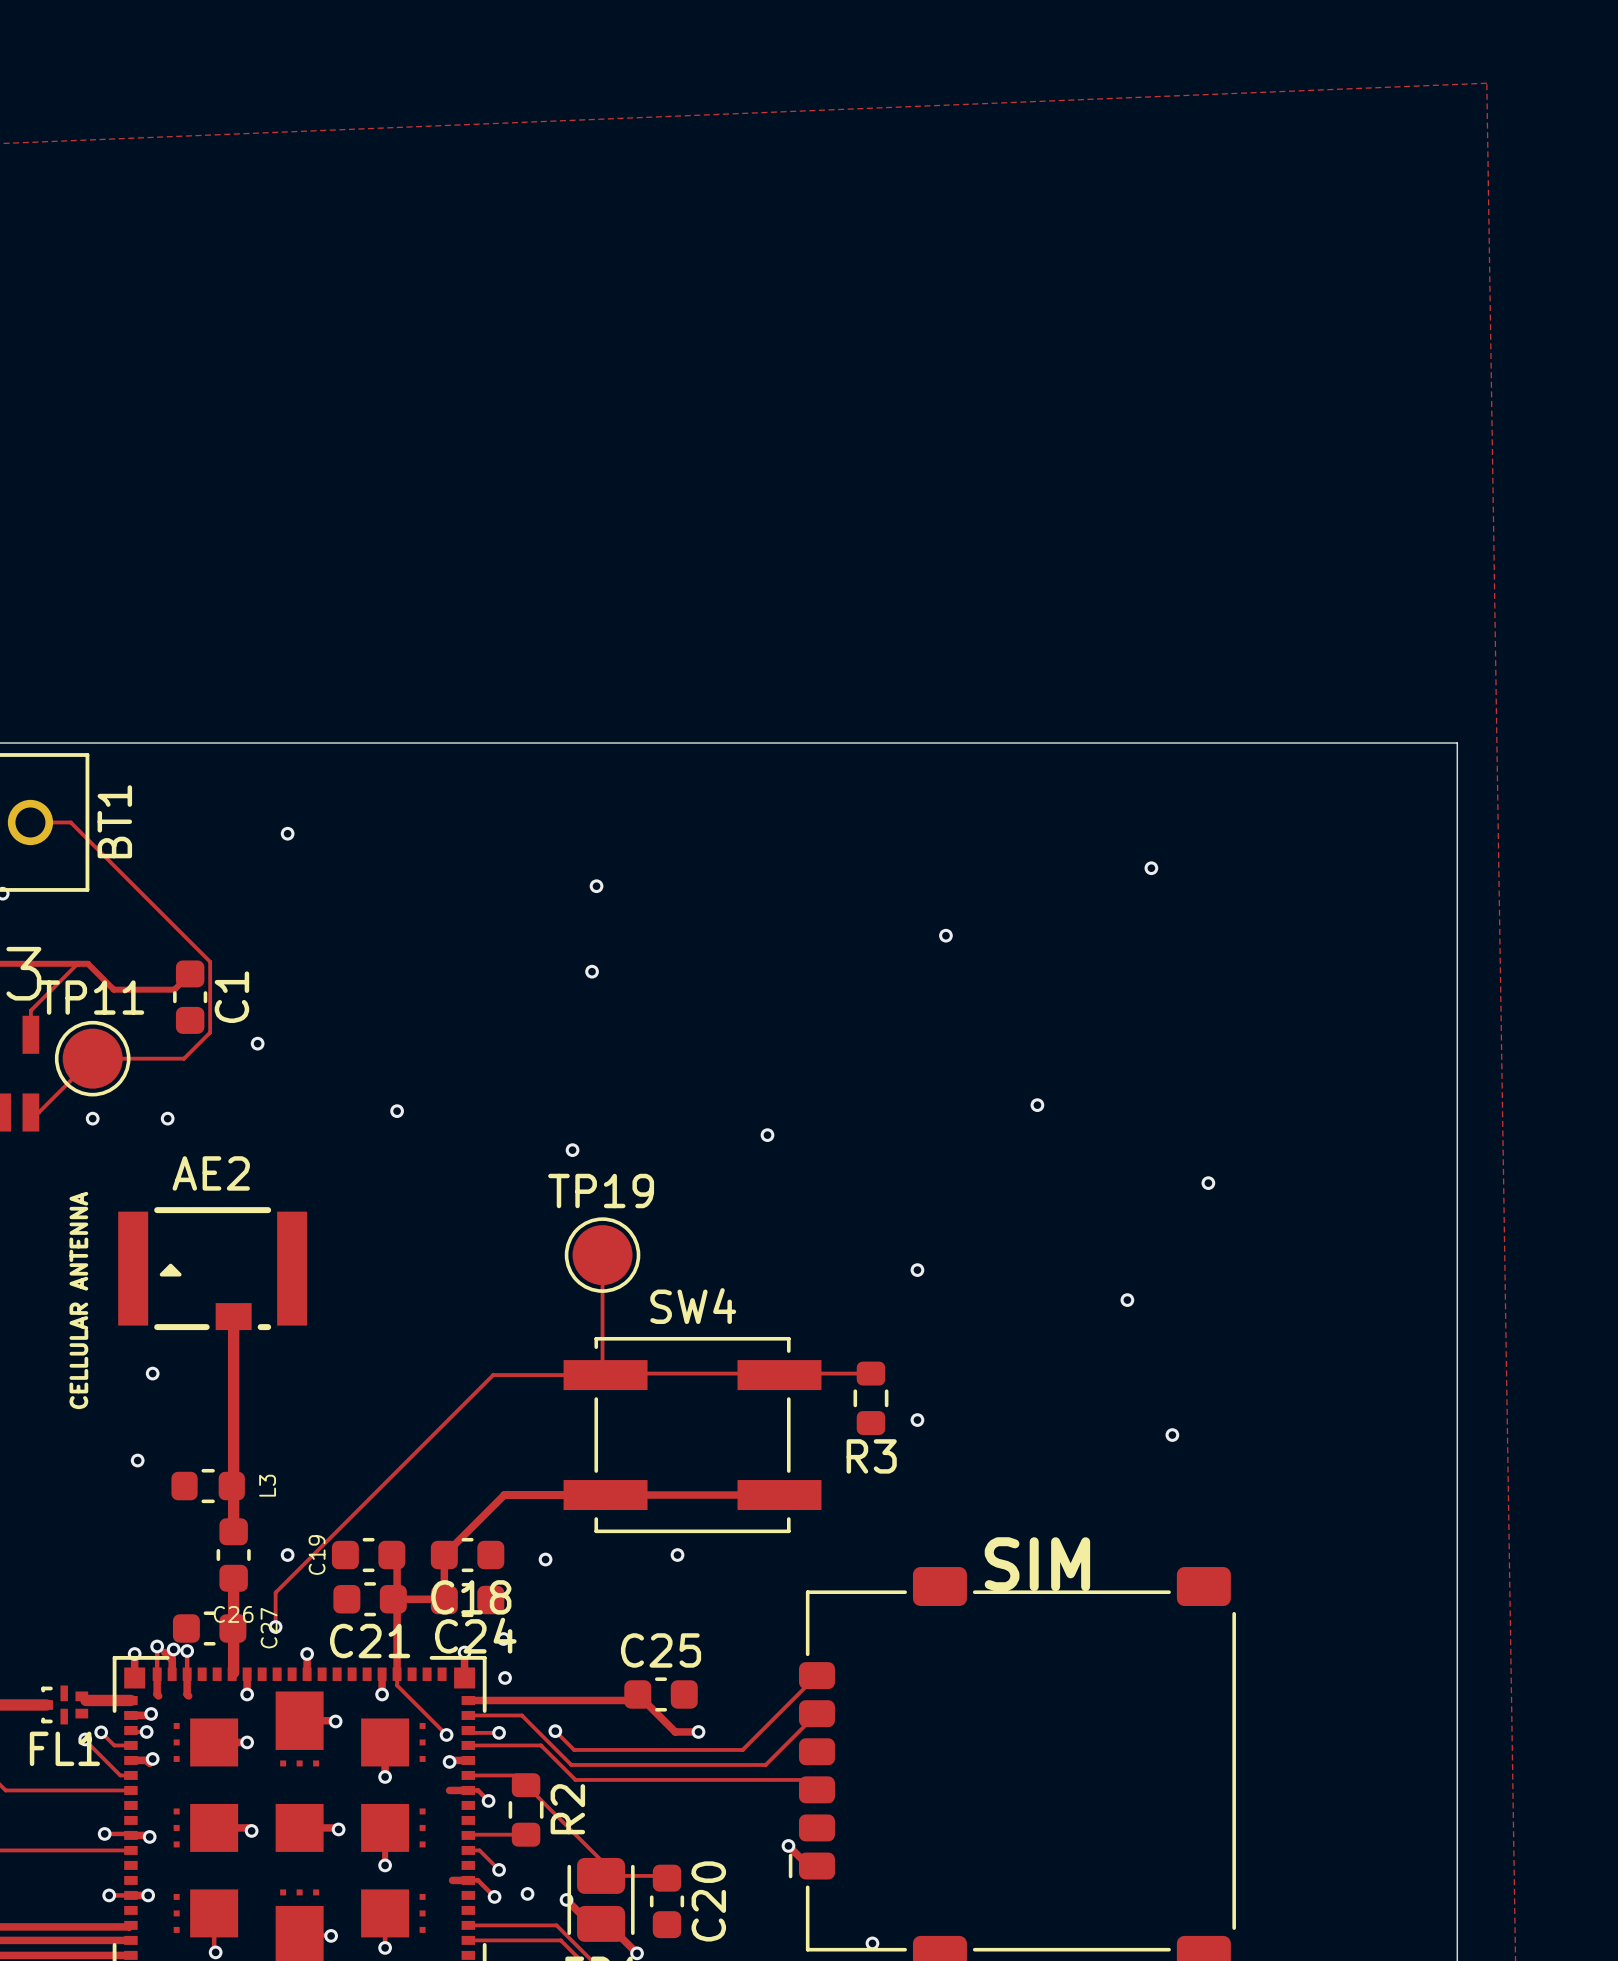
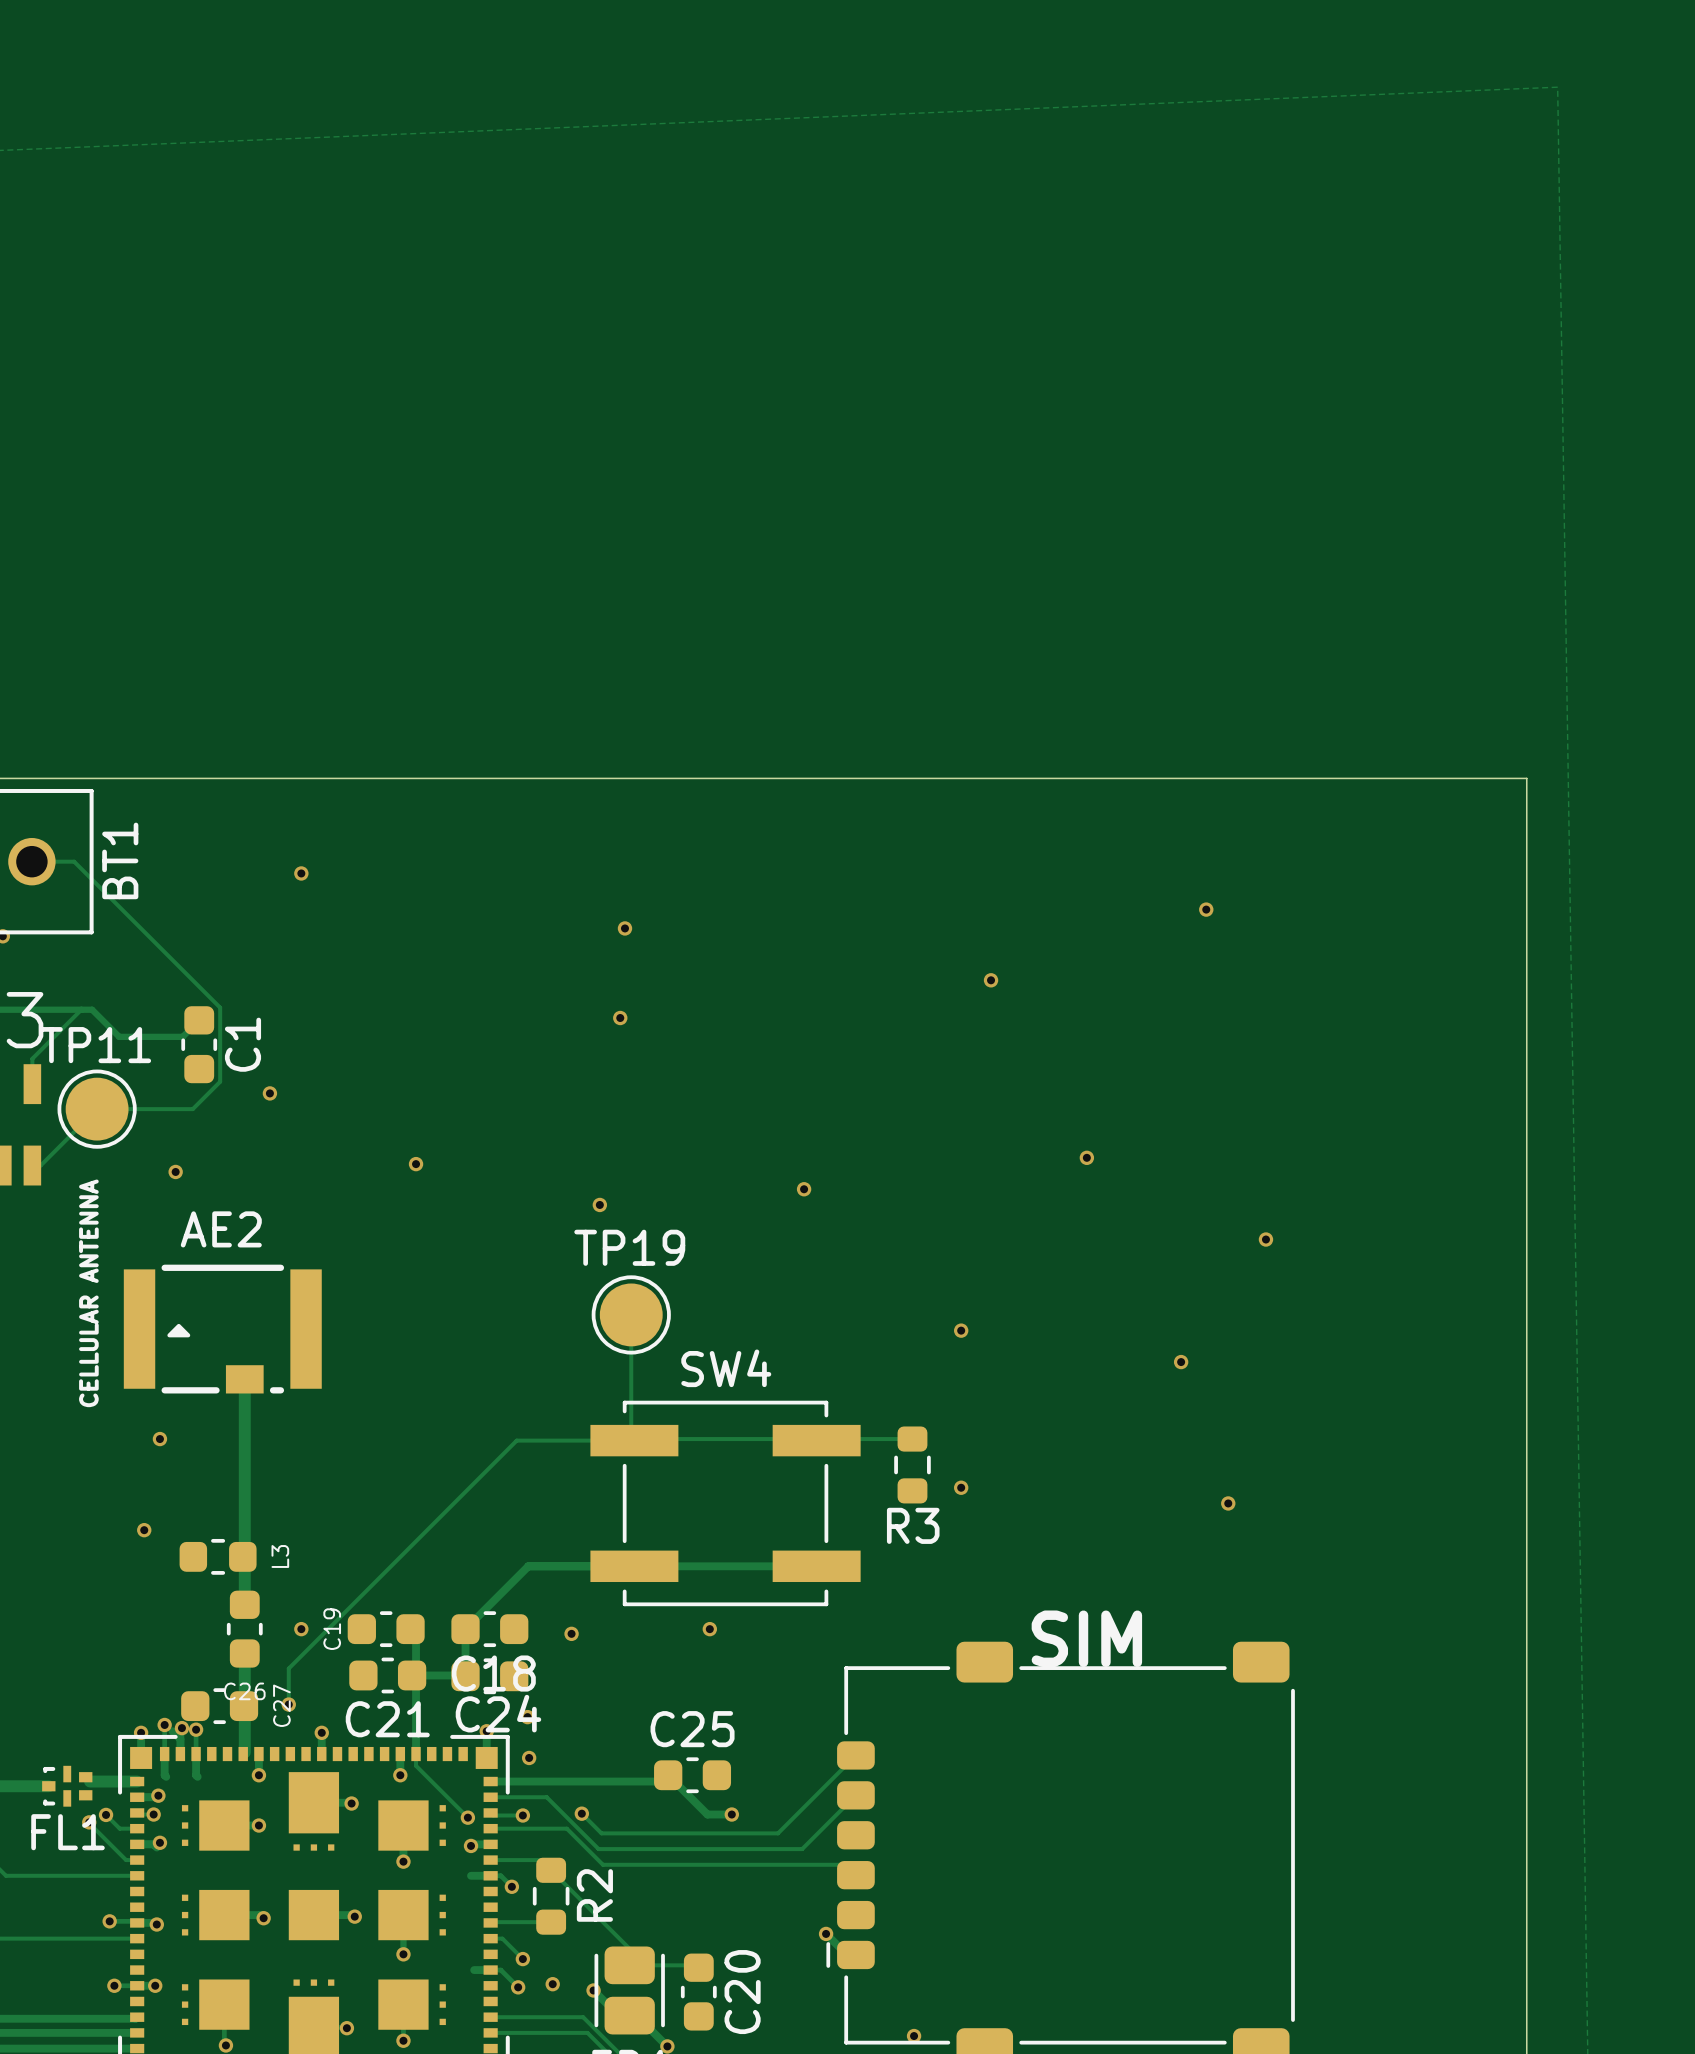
via: (92, 1118) -> none
text position: CELLULAR ANTENNA (78, 1300) -> CELLULAR ANTENNA (88, 1293)

